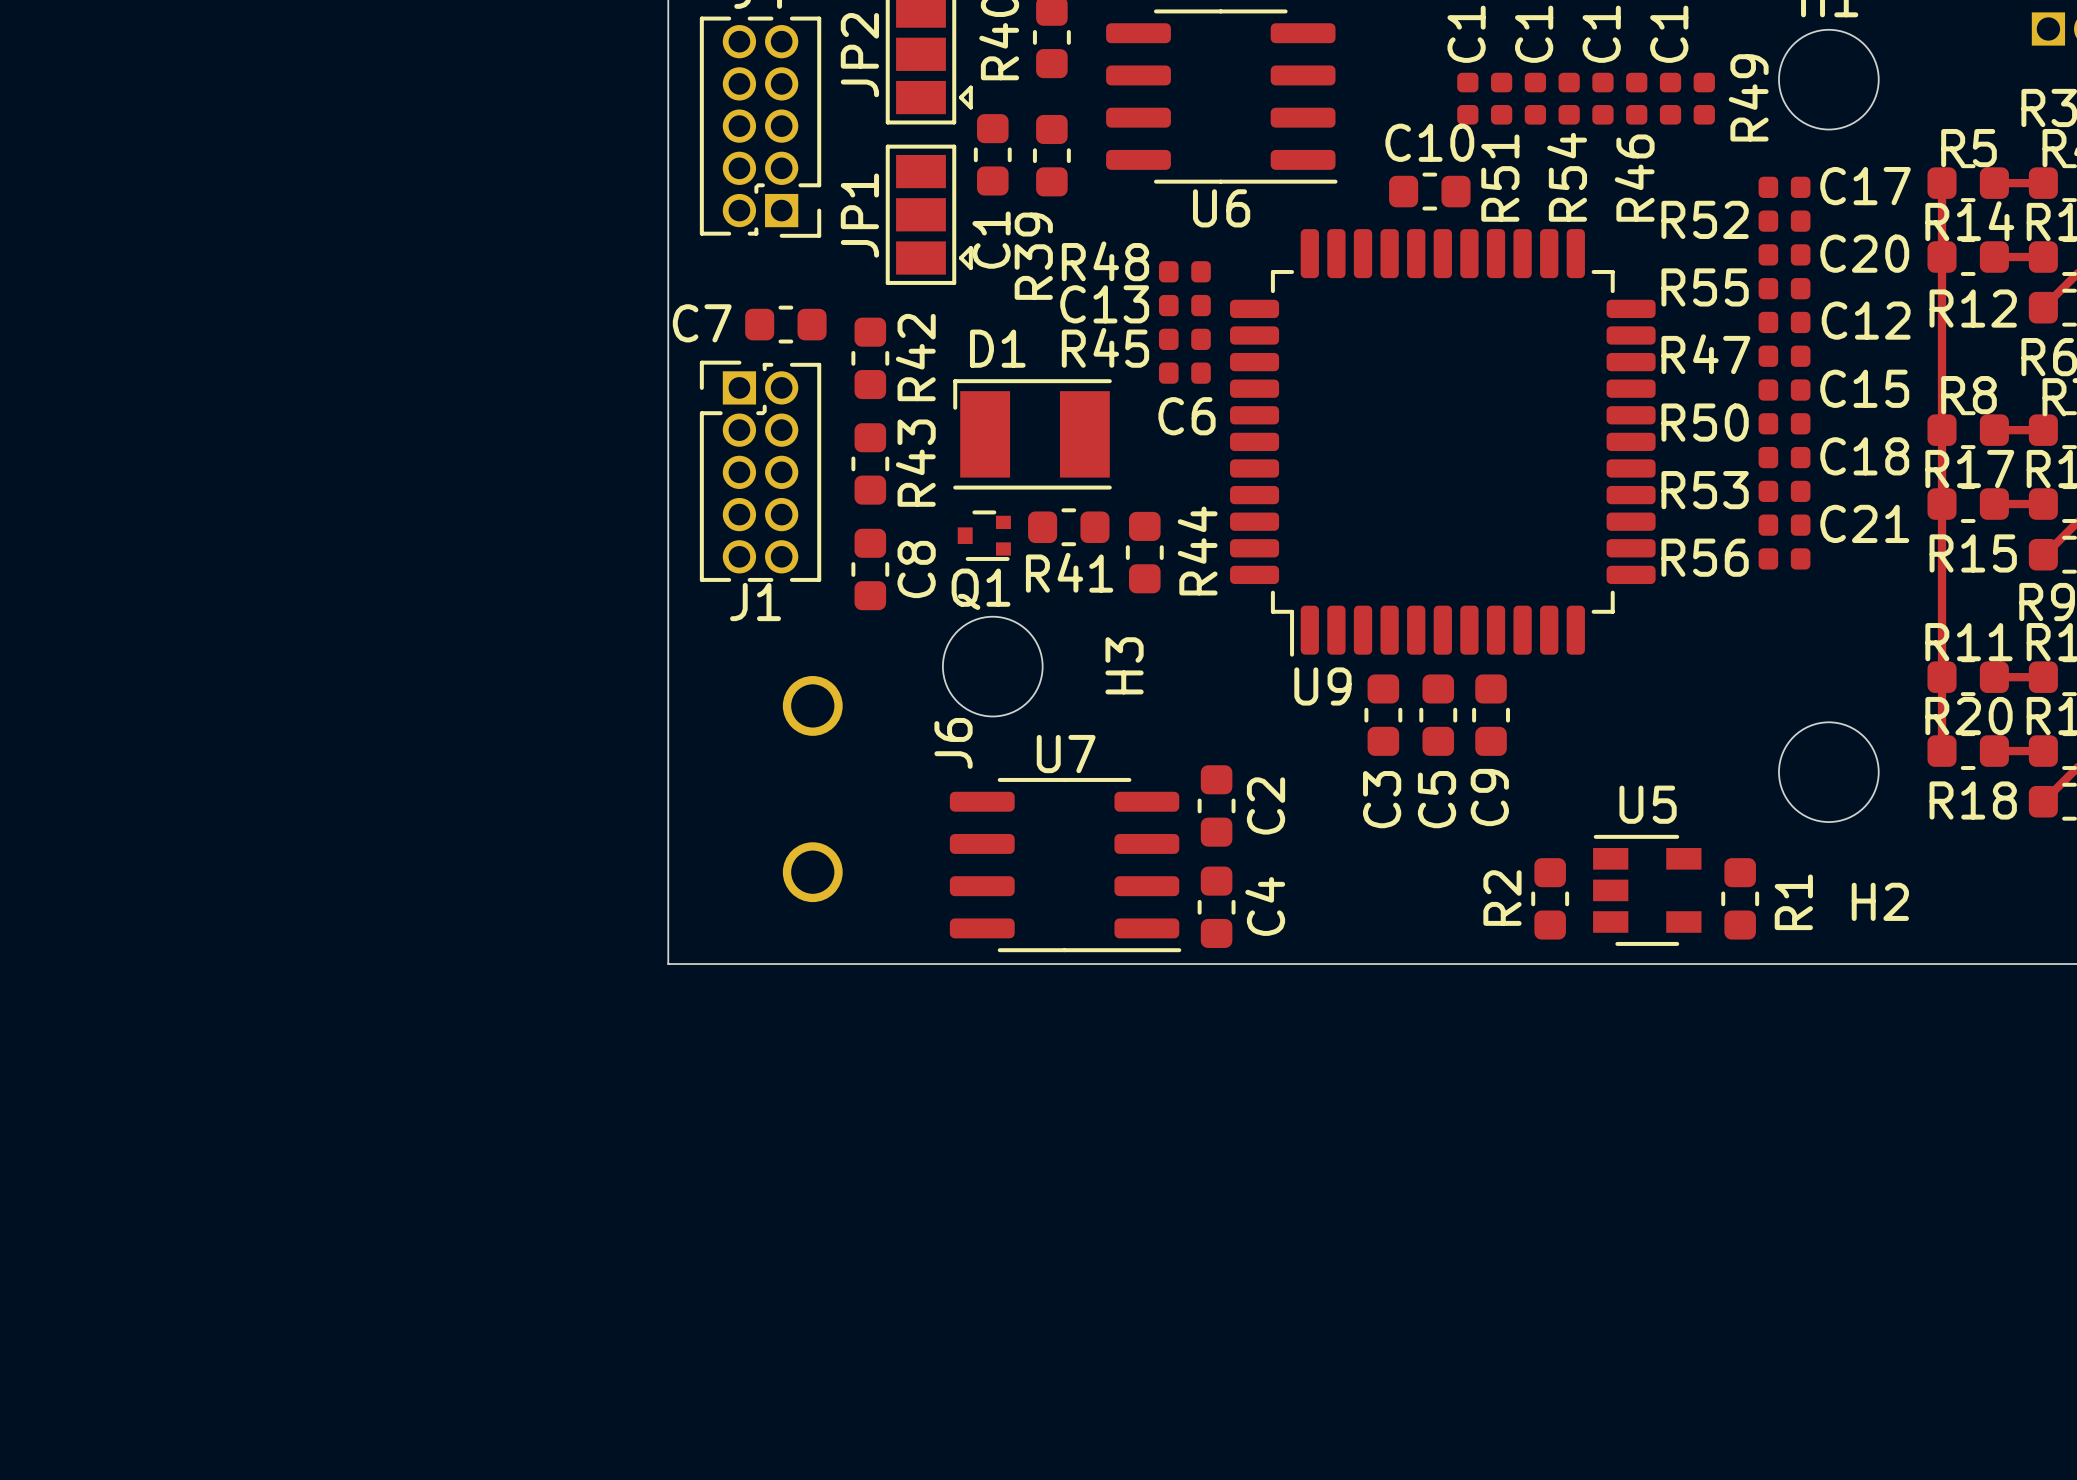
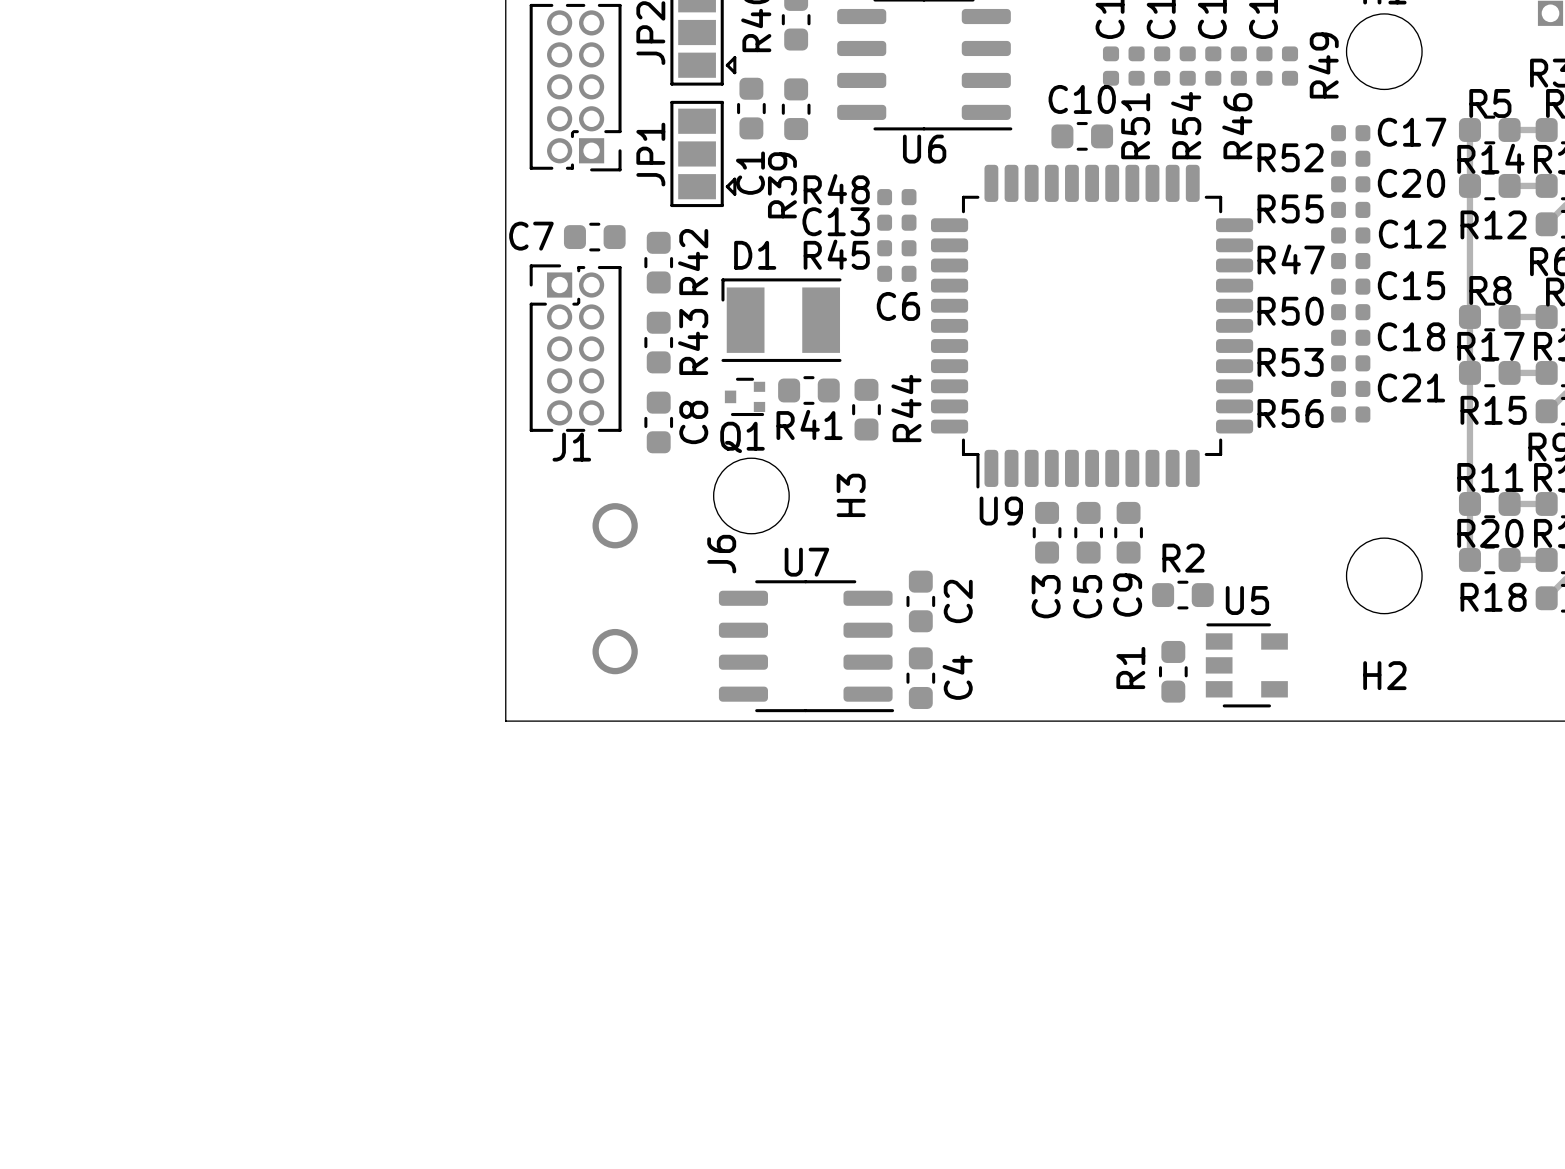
R2: none -> (1182, 595)
R2 name: R2 (1502, 898) -> R1 (1130, 667)
R1: (1740, 898) -> none
H2 name position: H2 (1880, 901) -> H2 (1384, 675)

